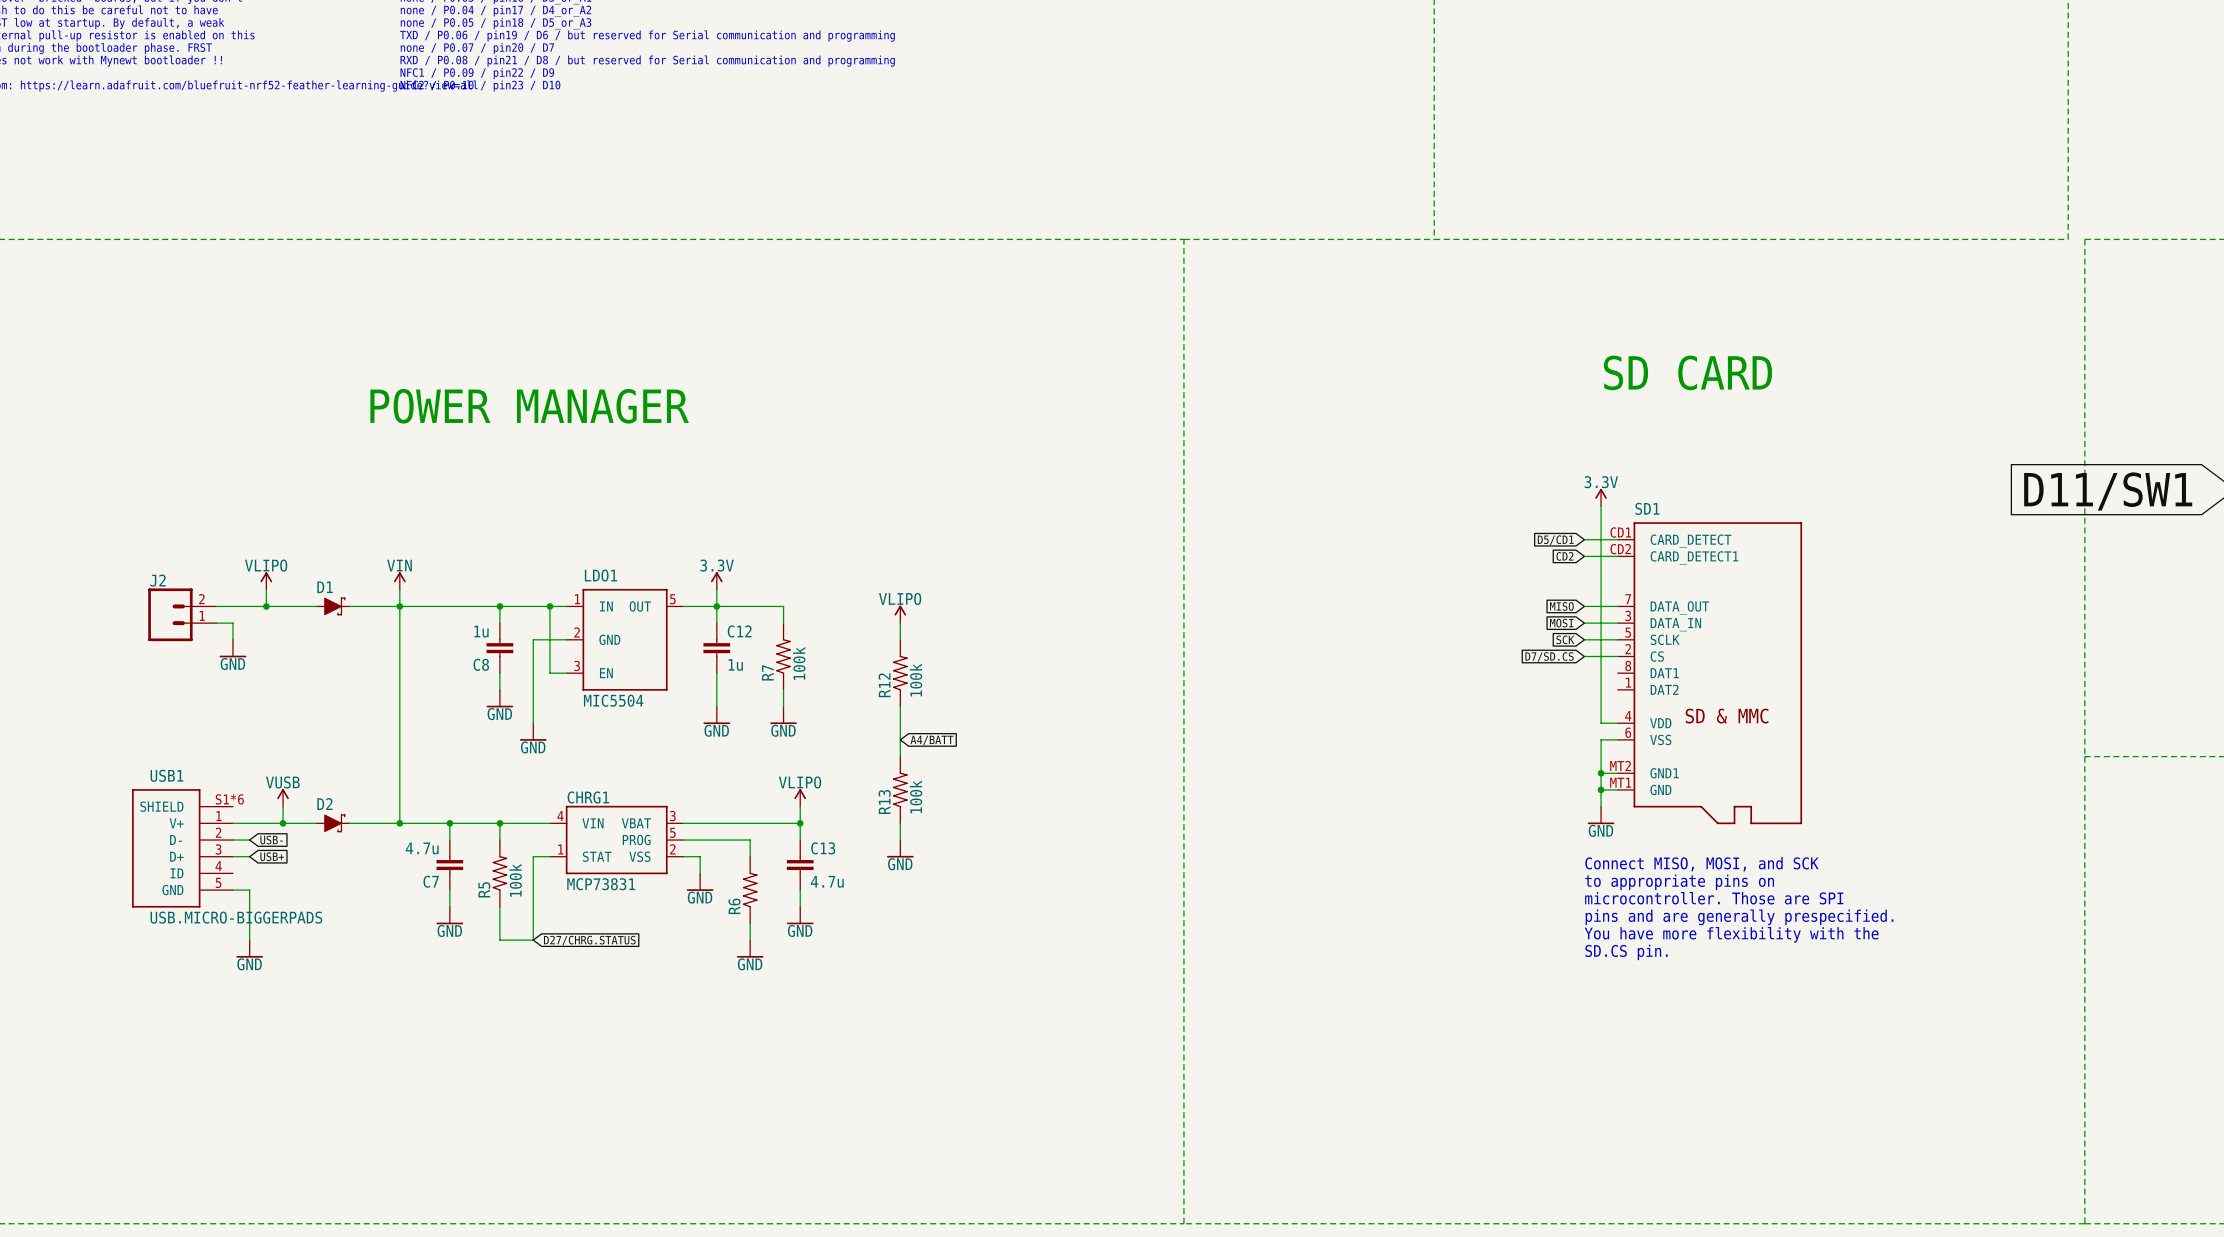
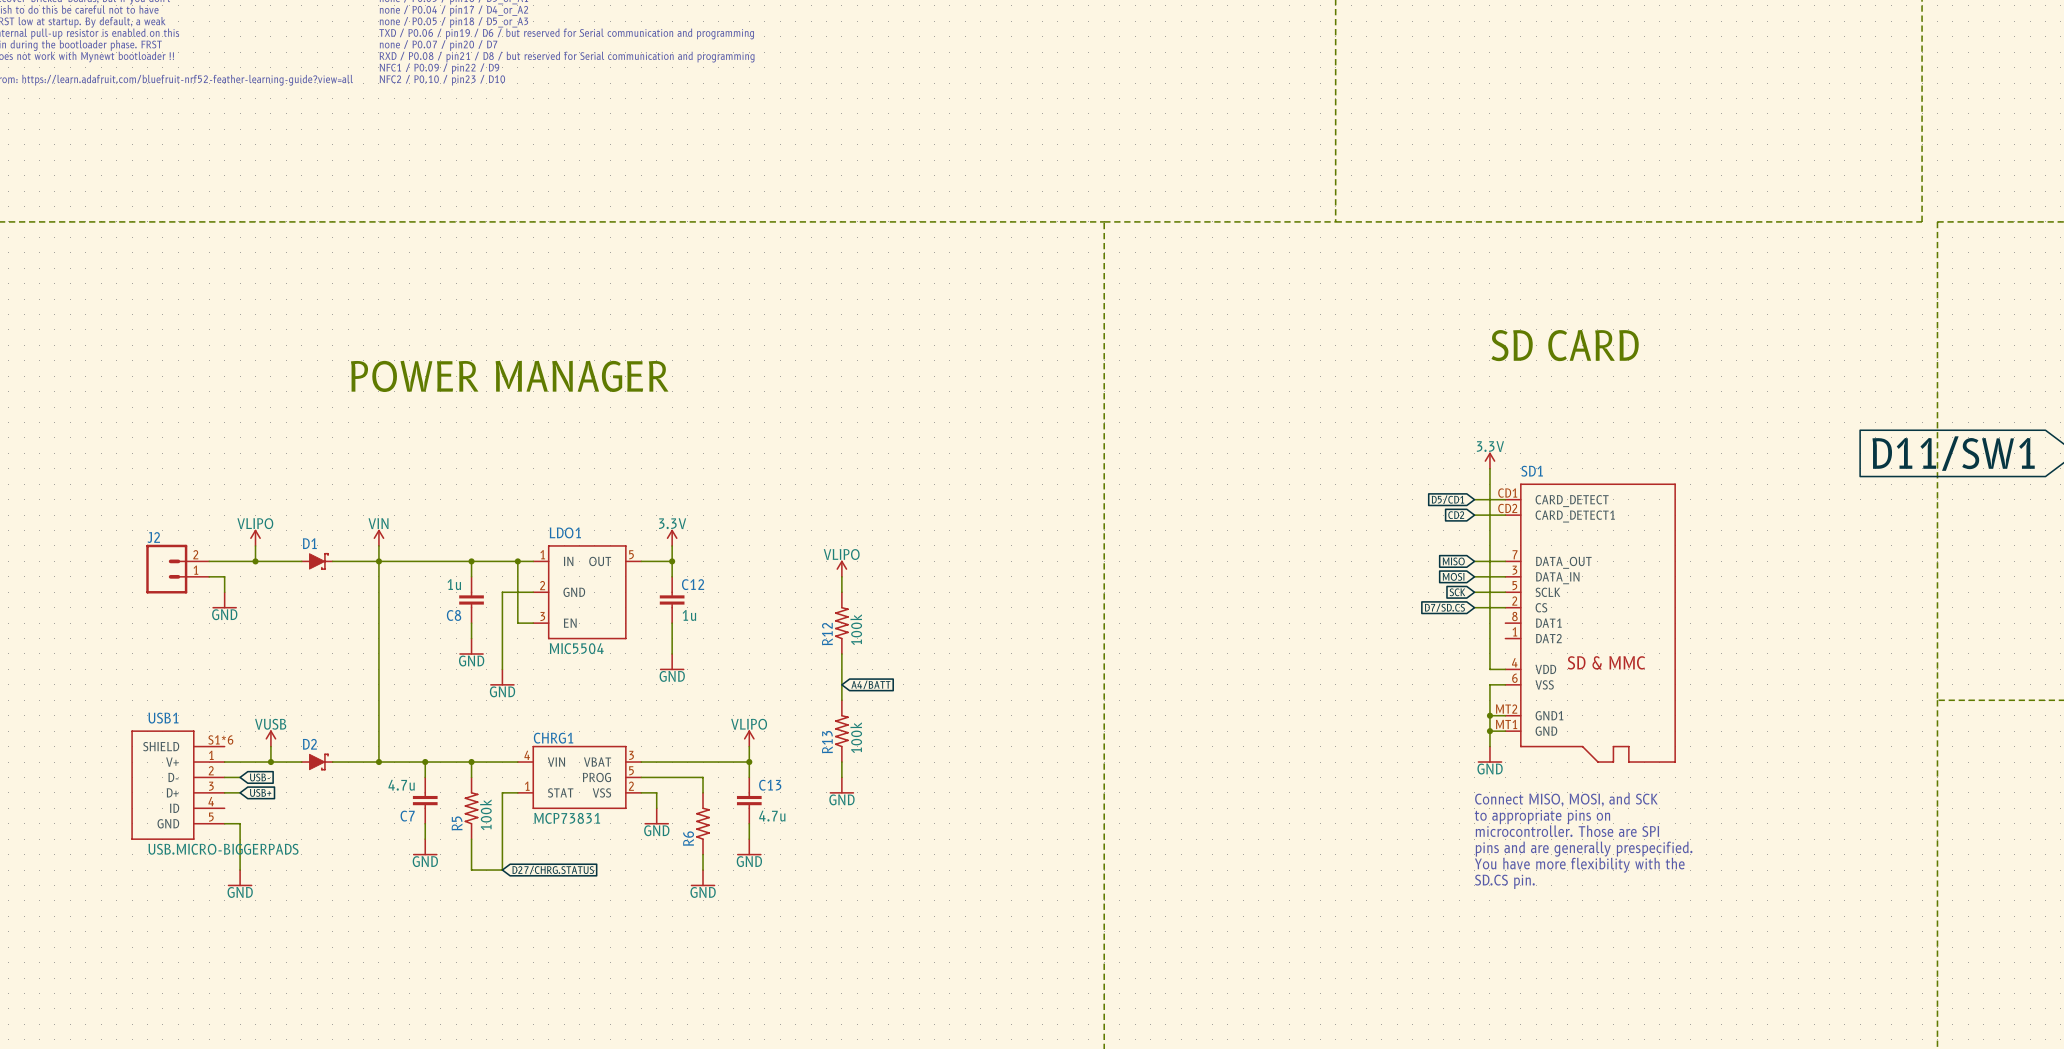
wire: (716, 606) (783, 606) (783, 623) -> none
R7: 100k (783, 656) -> none
wire: (783, 689) (783, 706) -> none
power symbol: GND (783, 715) -> none

